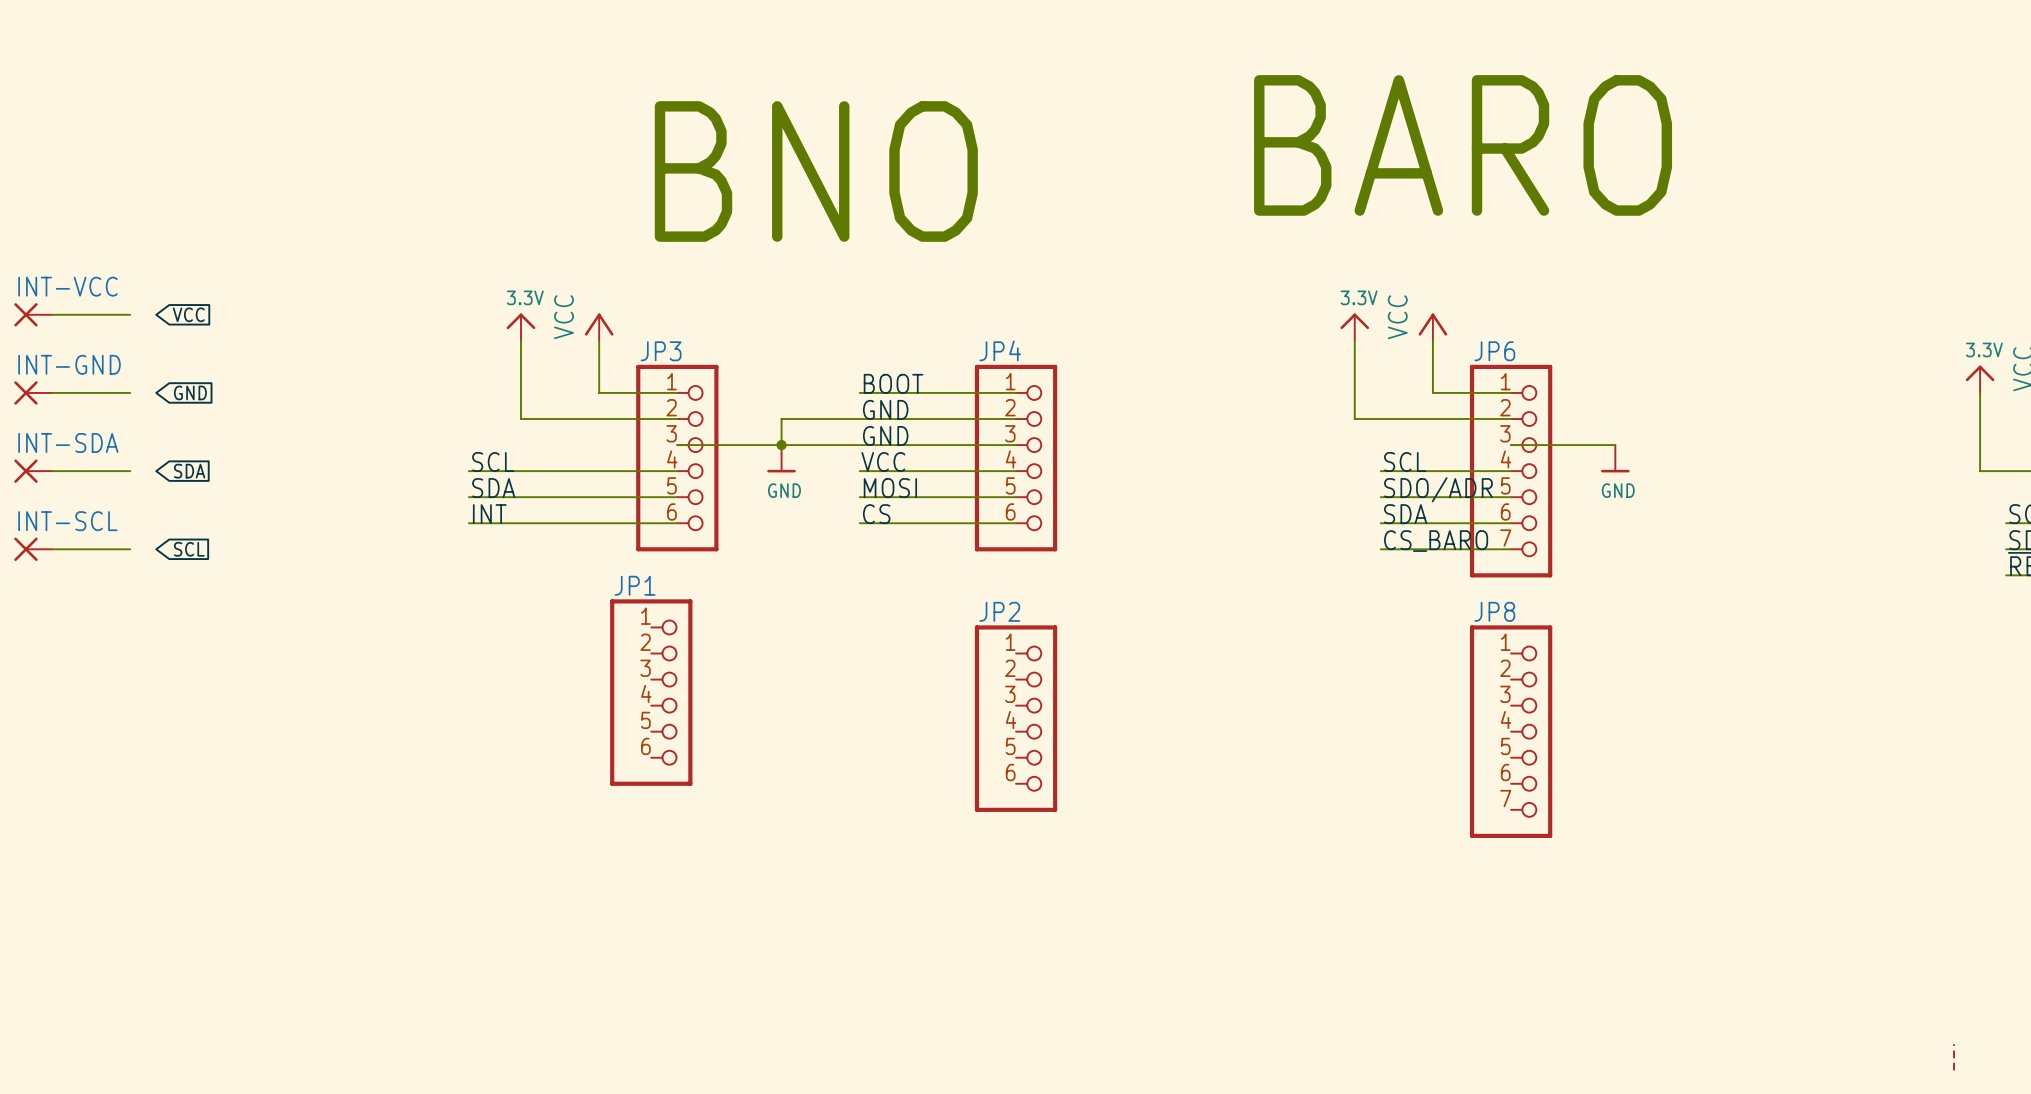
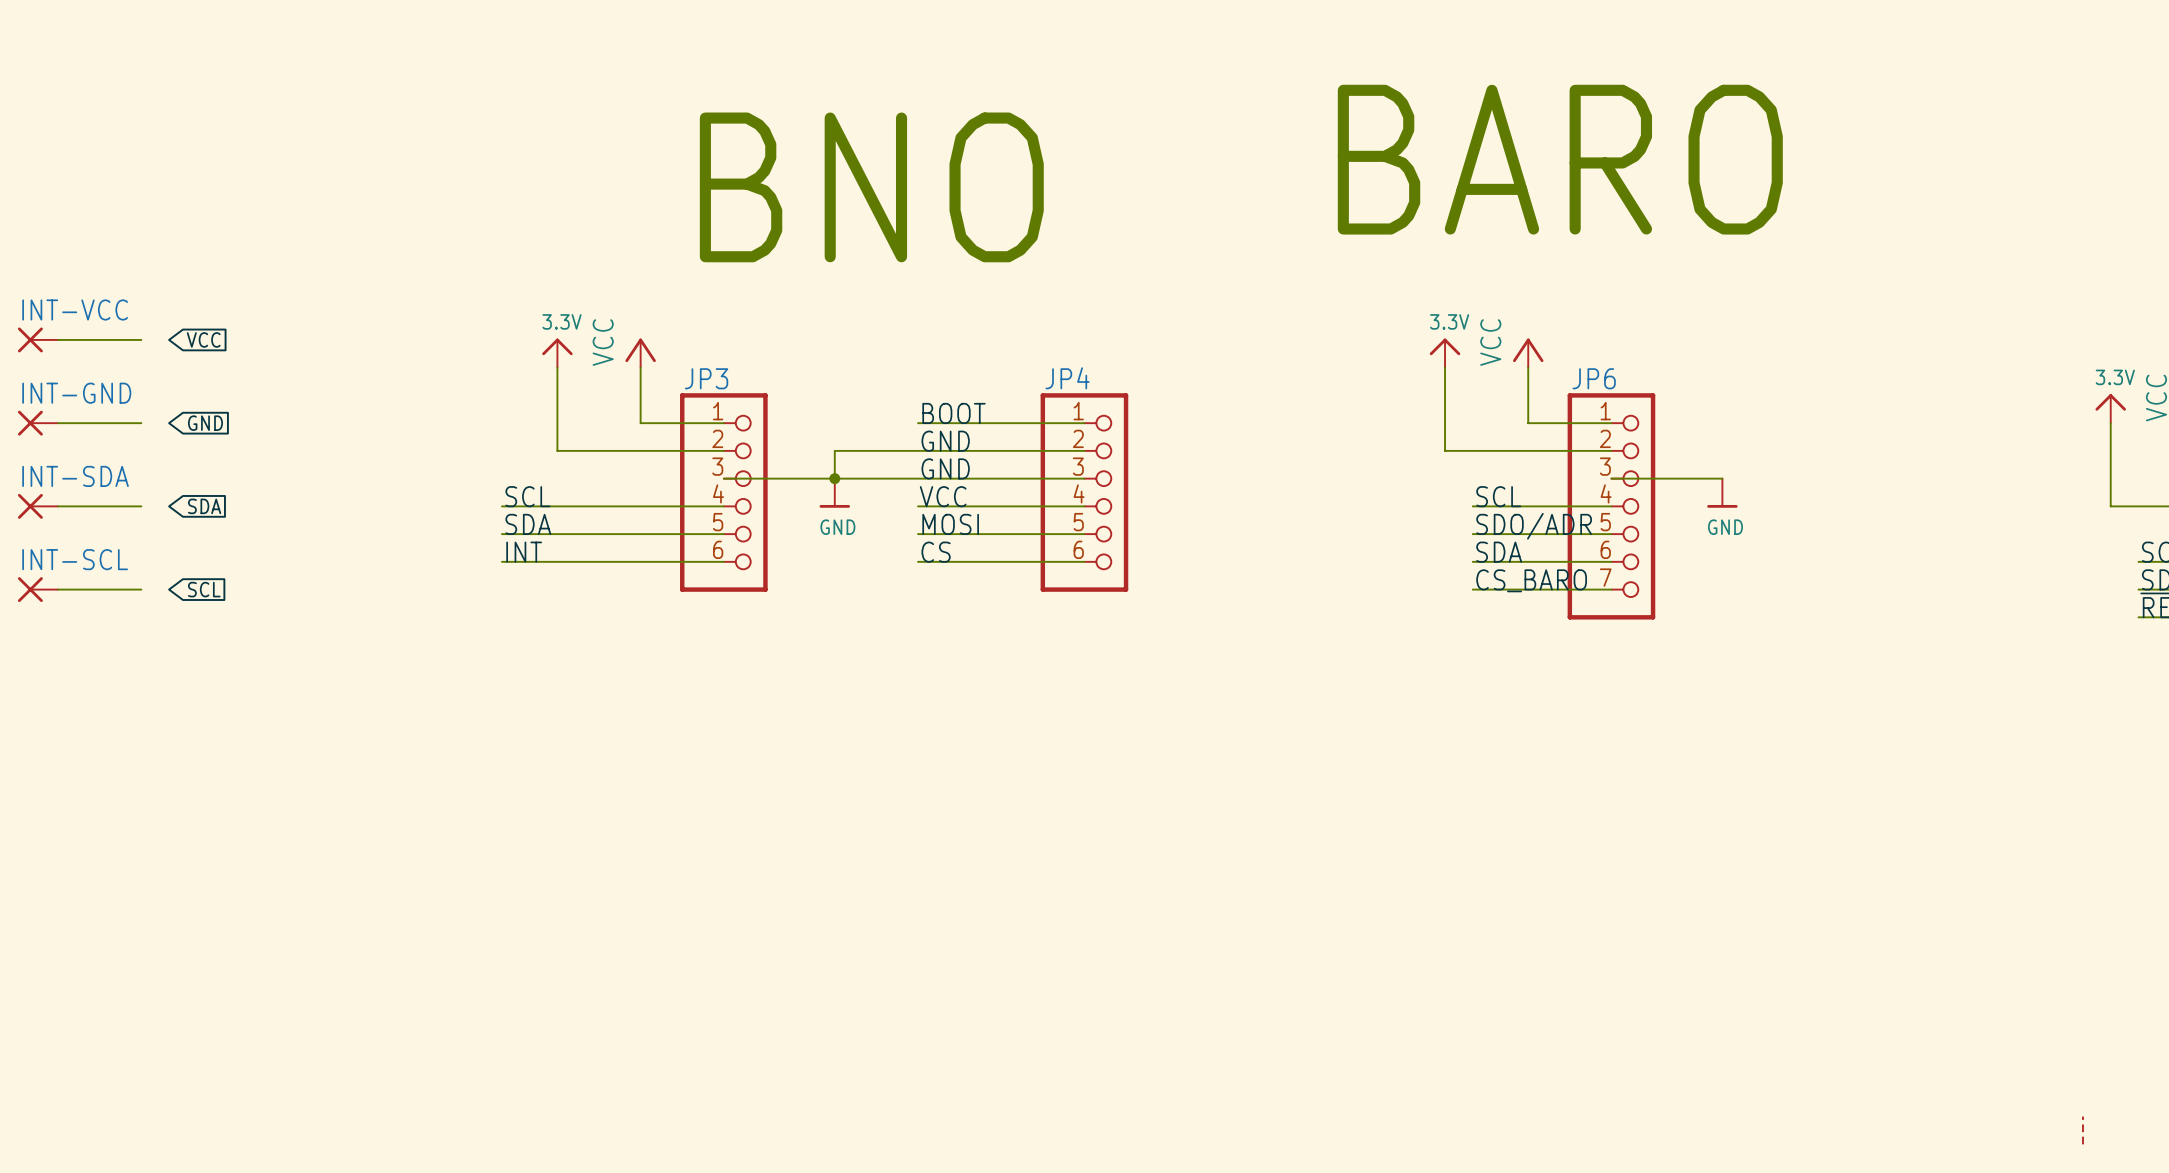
JP1: (651, 692) -> none
JP2: (1016, 718) -> none
JP8: (1511, 731) -> none

